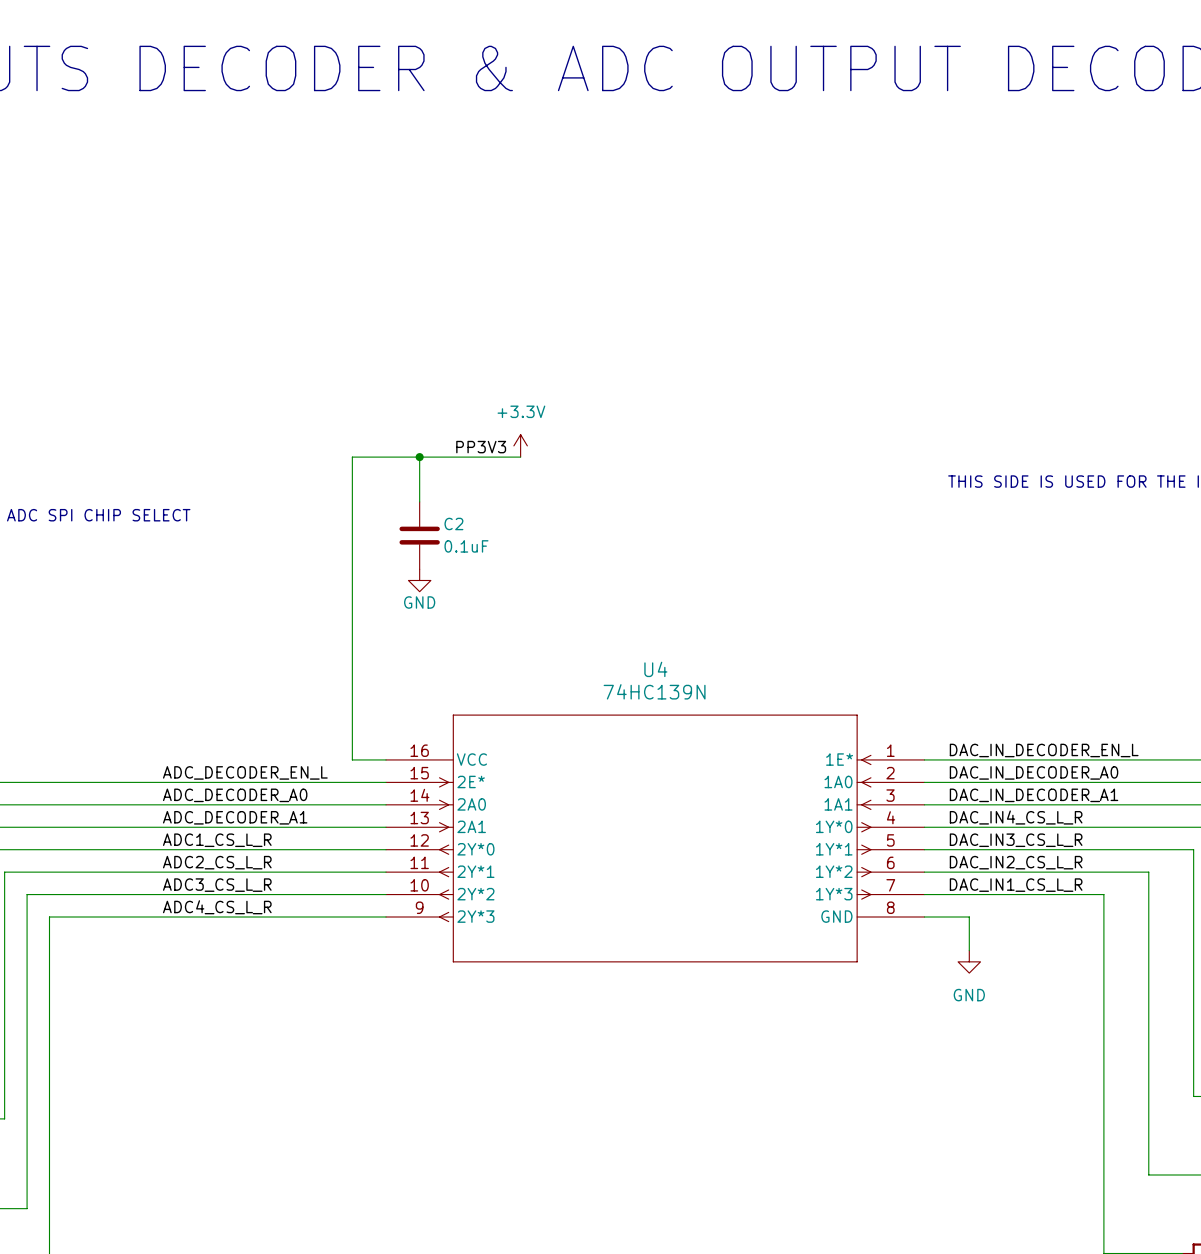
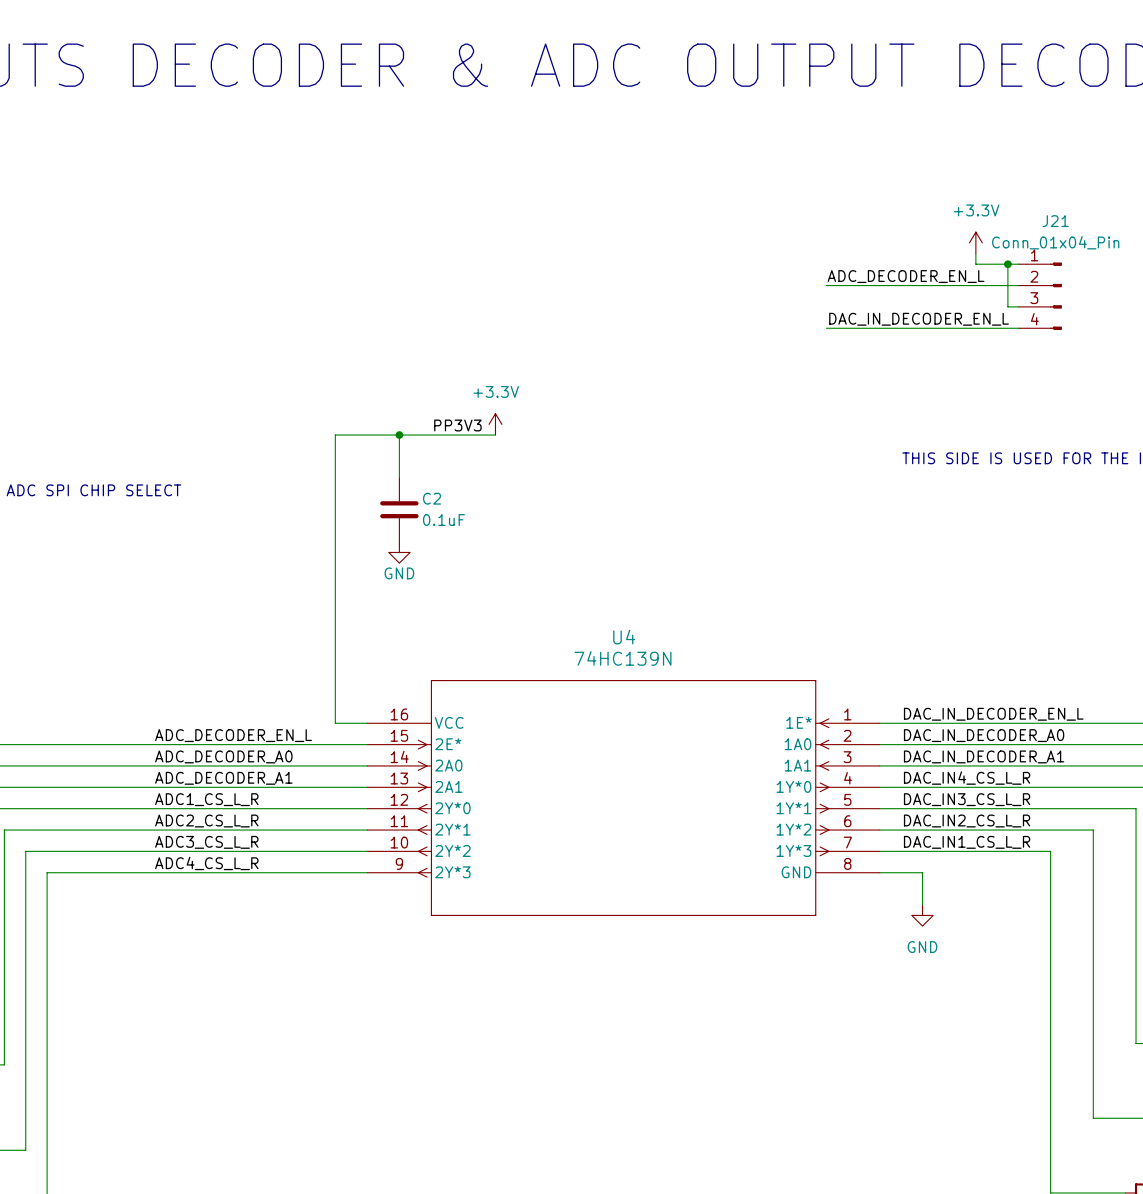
power symbol: none -> +3.3V (975, 242)
wire: none -> (975, 253) (975, 264) (1018, 264)
wire: none -> (1007, 264) (1007, 306) (1018, 306)
junction: none -> (1007, 264)
label: none -> ADC_DECODER_EN_L (906, 276)
wire: none -> (826, 285) (1018, 285)
J21: none -> Conn_01x04_Pin (1040, 296)
label: none -> DAC_IN_DECODER_EN_L (919, 319)
wire: none -> (826, 328) (1018, 328)

